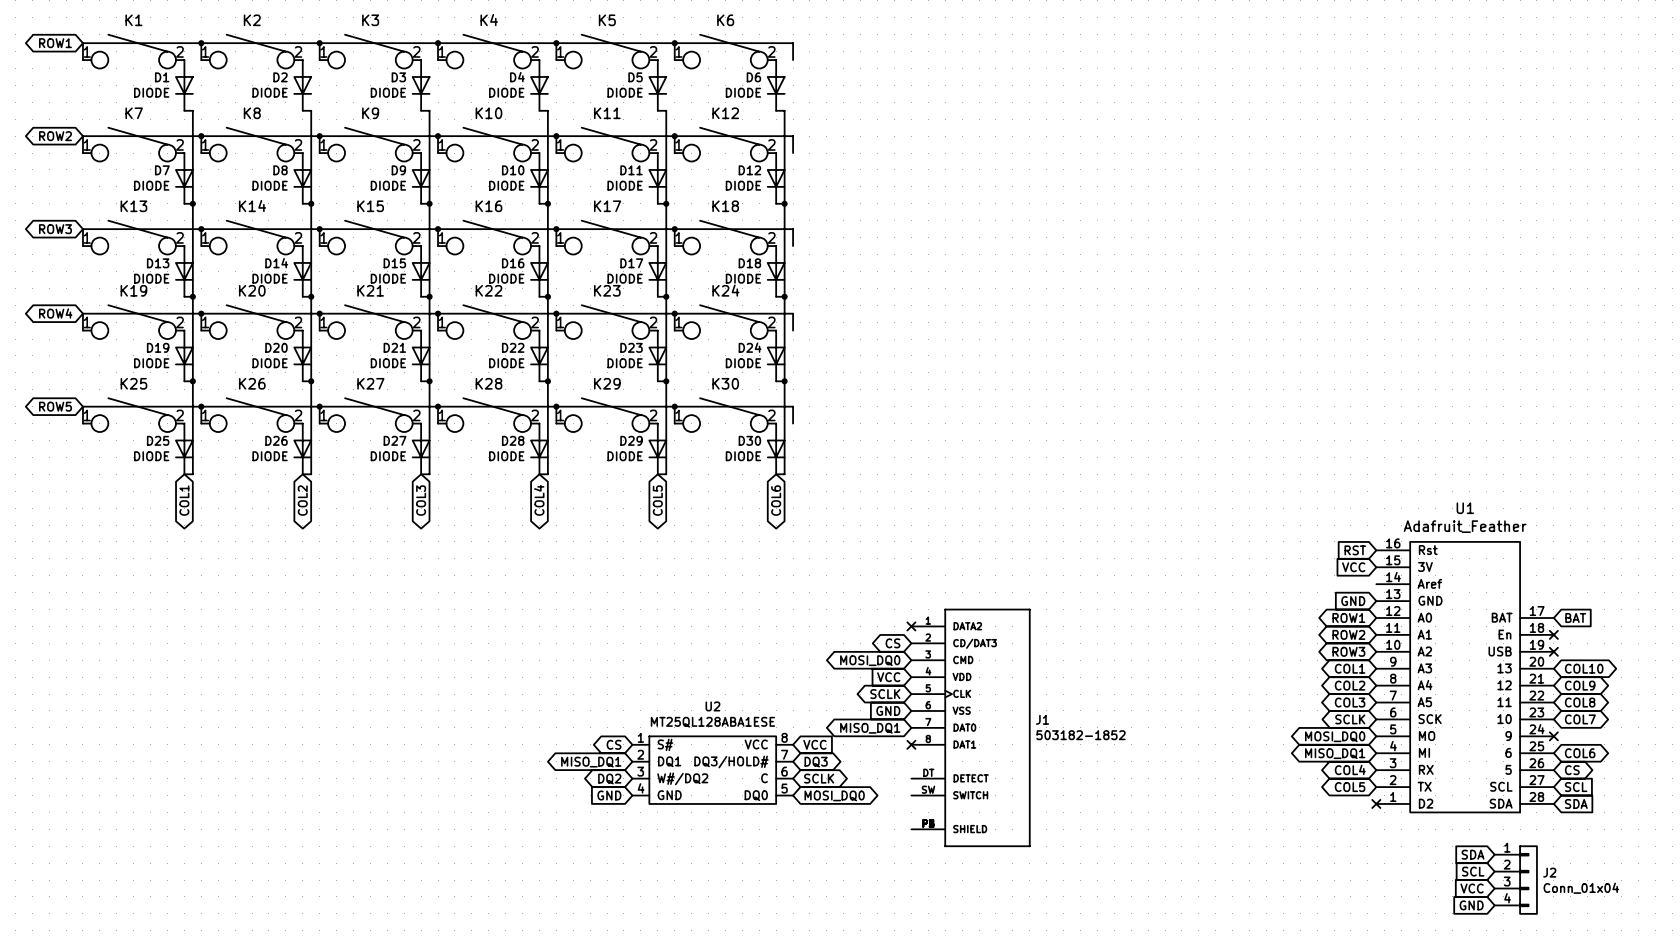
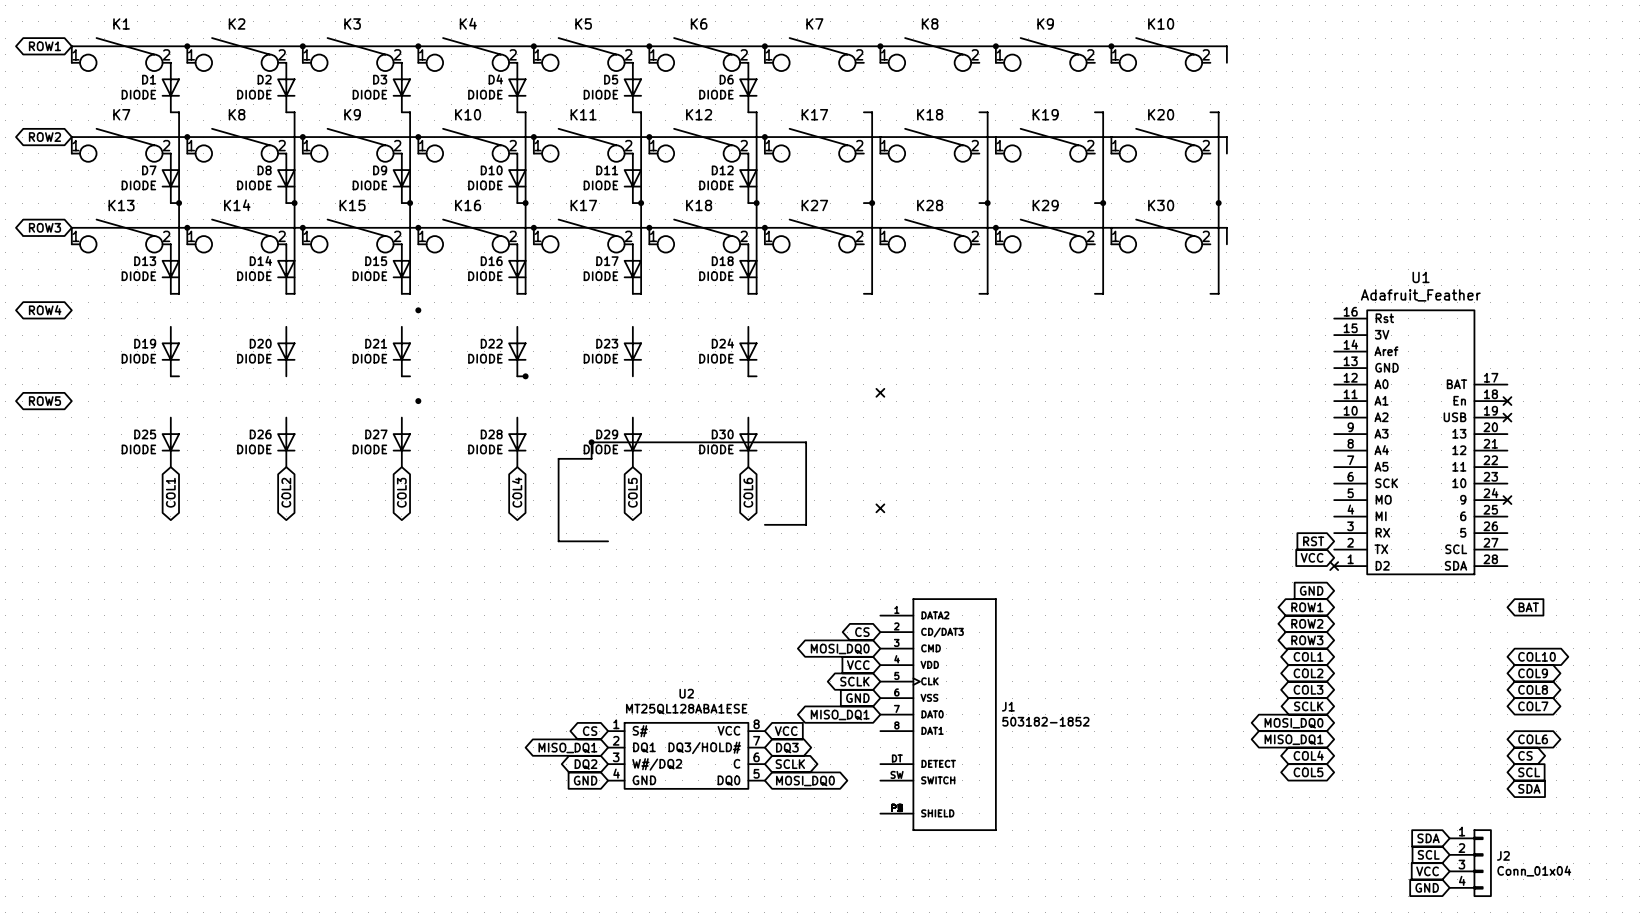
wire: none -> (764, 46) (1226, 46) (1226, 62)
junction: none -> (764, 46)
wire: none -> (880, 46) (880, 62)
junction: none -> (880, 46)
wire: none -> (995, 46) (995, 62)
junction: none -> (995, 46)
wire: none -> (1111, 46) (1111, 62)
junction: none -> (1111, 46)
K7: none -> (814, 54)
K8: none -> (929, 54)
K9: none -> (1045, 54)
K10: none -> (1160, 54)
wire: none -> (863, 112) (872, 112) (872, 293) (863, 293)
wire: none -> (979, 112) (987, 112) (987, 293) (979, 293)
wire: none -> (1094, 112) (1103, 112) (1103, 293) (1094, 293)
wire: none -> (1210, 112) (1218, 112) (1218, 293) (1210, 293)
wire: none -> (764, 137) (1226, 137) (1226, 153)
junction: none -> (764, 137)
wire: none -> (880, 137) (880, 153)
wire: none -> (995, 137) (995, 153)
wire: none -> (1111, 137) (1111, 153)
K17: none -> (814, 144)
K18: none -> (929, 144)
wire: none -> (863, 203) (872, 203)
junction: none -> (872, 203)
wire: none -> (979, 203) (987, 203)
junction: none -> (987, 203)
wire: none -> (1094, 203) (1103, 203)
junction: none -> (1103, 203)
junction: none -> (1218, 203)
wire: none -> (764, 227) (1226, 227) (1226, 244)
junction: none -> (764, 227)
wire: none -> (880, 227) (880, 244)
wire: none -> (995, 227) (995, 244)
junction: none -> (995, 227)
wire: none -> (1111, 227) (1111, 244)
wire: (192, 296) (192, 474) (184, 474) -> none
junction: (192, 296) -> none
wire: (311, 296) (311, 474) (302, 474) -> none
junction: (311, 296) -> none
wire: (429, 296) (429, 474) (421, 474) -> none
junction: (429, 296) -> none
wire: (547, 296) (547, 474) (539, 474) -> none
junction: (547, 296) -> none
wire: (666, 296) (666, 474) (657, 474) -> none
junction: (666, 296) -> none
wire: (784, 296) (784, 474) (776, 474) -> none
junction: (784, 296) -> none
wire: (201, 313) (201, 330) -> none
junction: (201, 313) -> none
wire: (319, 313) (319, 330) -> none
junction: (319, 313) -> none
wire: (438, 313) (438, 330) -> none
wire: (556, 313) (556, 330) -> none
junction: (556, 313) -> none
wire: (674, 313) (674, 330) -> none
junction: (674, 313) -> none
K19 position: (133, 321) -> (1045, 144)
K20 position: (252, 321) -> (1160, 144)
K21: (370, 321) -> none
K22: (488, 321) -> none
K23: (607, 321) -> none
K24: (725, 321) -> none
wire: (82, 330) (82, 313) (793, 313) (793, 330) -> none
junction: (192, 381) -> none
wire: (302, 381) (311, 381) -> none
junction: (311, 381) -> none
junction: (429, 381) -> none
wire: (657, 381) (666, 381) -> none
junction: (666, 381) -> none
junction: (784, 381) -> none
no-connect mark: none -> (880, 392)
wire: (201, 406) (201, 423) -> none
junction: (201, 406) -> none
wire: (319, 406) (319, 423) -> none
junction: (319, 406) -> none
wire: (438, 406) (438, 423) -> none
wire: (556, 406) (556, 423) -> none
junction: (556, 406) -> none
wire: (674, 406) (674, 423) -> none
junction: (674, 406) -> none
no-connect mark: none -> (1507, 401)
K25: (133, 414) -> none
K26: (252, 414) -> none
K27 position: (370, 414) -> (814, 235)
K28 position: (488, 414) -> (929, 235)
K29 position: (607, 414) -> (1045, 235)
K30 position: (725, 414) -> (1160, 235)
wire: (82, 423) (82, 406) (793, 406) (793, 423) -> none
no-connect mark: none -> (1507, 417)
junction: none -> (591, 442)
no-connect mark: none -> (1507, 500)
no-connect mark: none -> (880, 508)
wire: none -> (764, 524) (806, 524) (806, 442) (591, 442) (591, 458) (558, 458) (558, 541) (608, 541)
no-connect mark: none -> (1334, 566)
no-connect mark: (911, 626) -> none
no-connect mark: (1553, 634) -> none
no-connect mark: (1553, 651) -> none
U1 position: (1465, 677) -> (1420, 442)
no-connect mark: (1553, 736) -> none
no-connect mark: (911, 744) -> none
no-connect mark: (1376, 803) -> none

